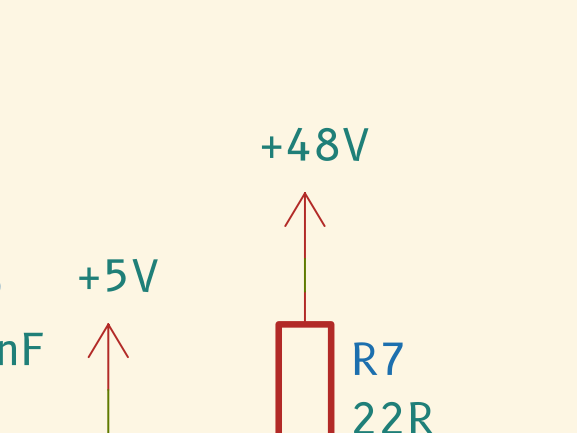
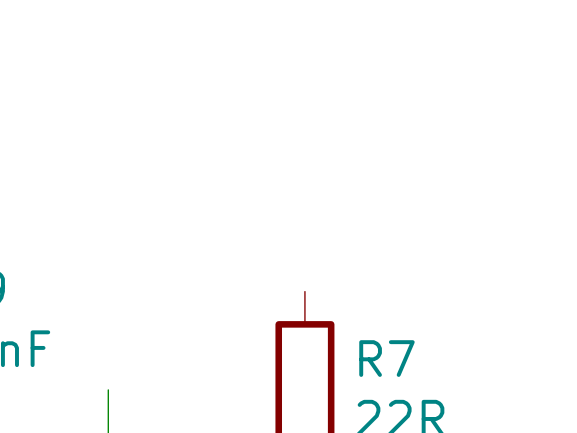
power symbol: +48V (304, 226) -> none
wire: (304, 258) (304, 291) -> none
power symbol: +5V (108, 357) -> none

